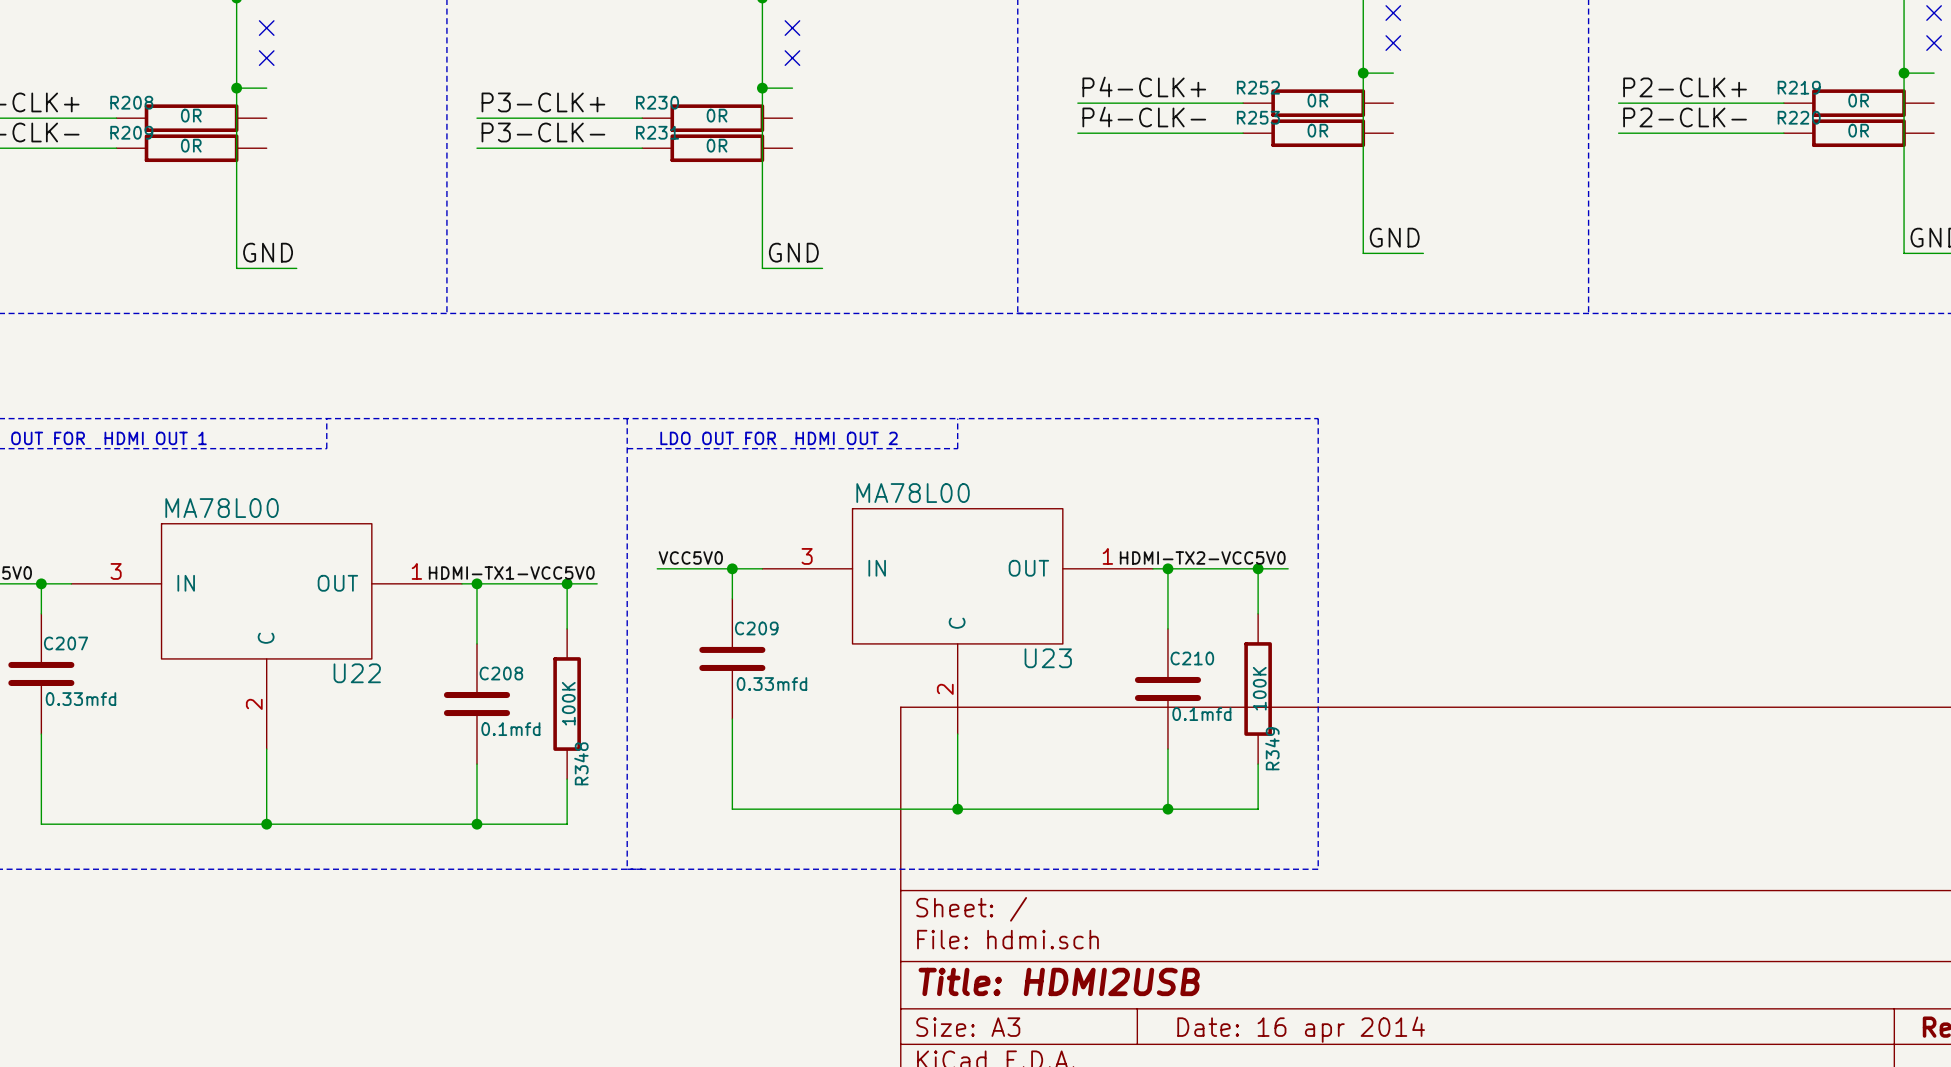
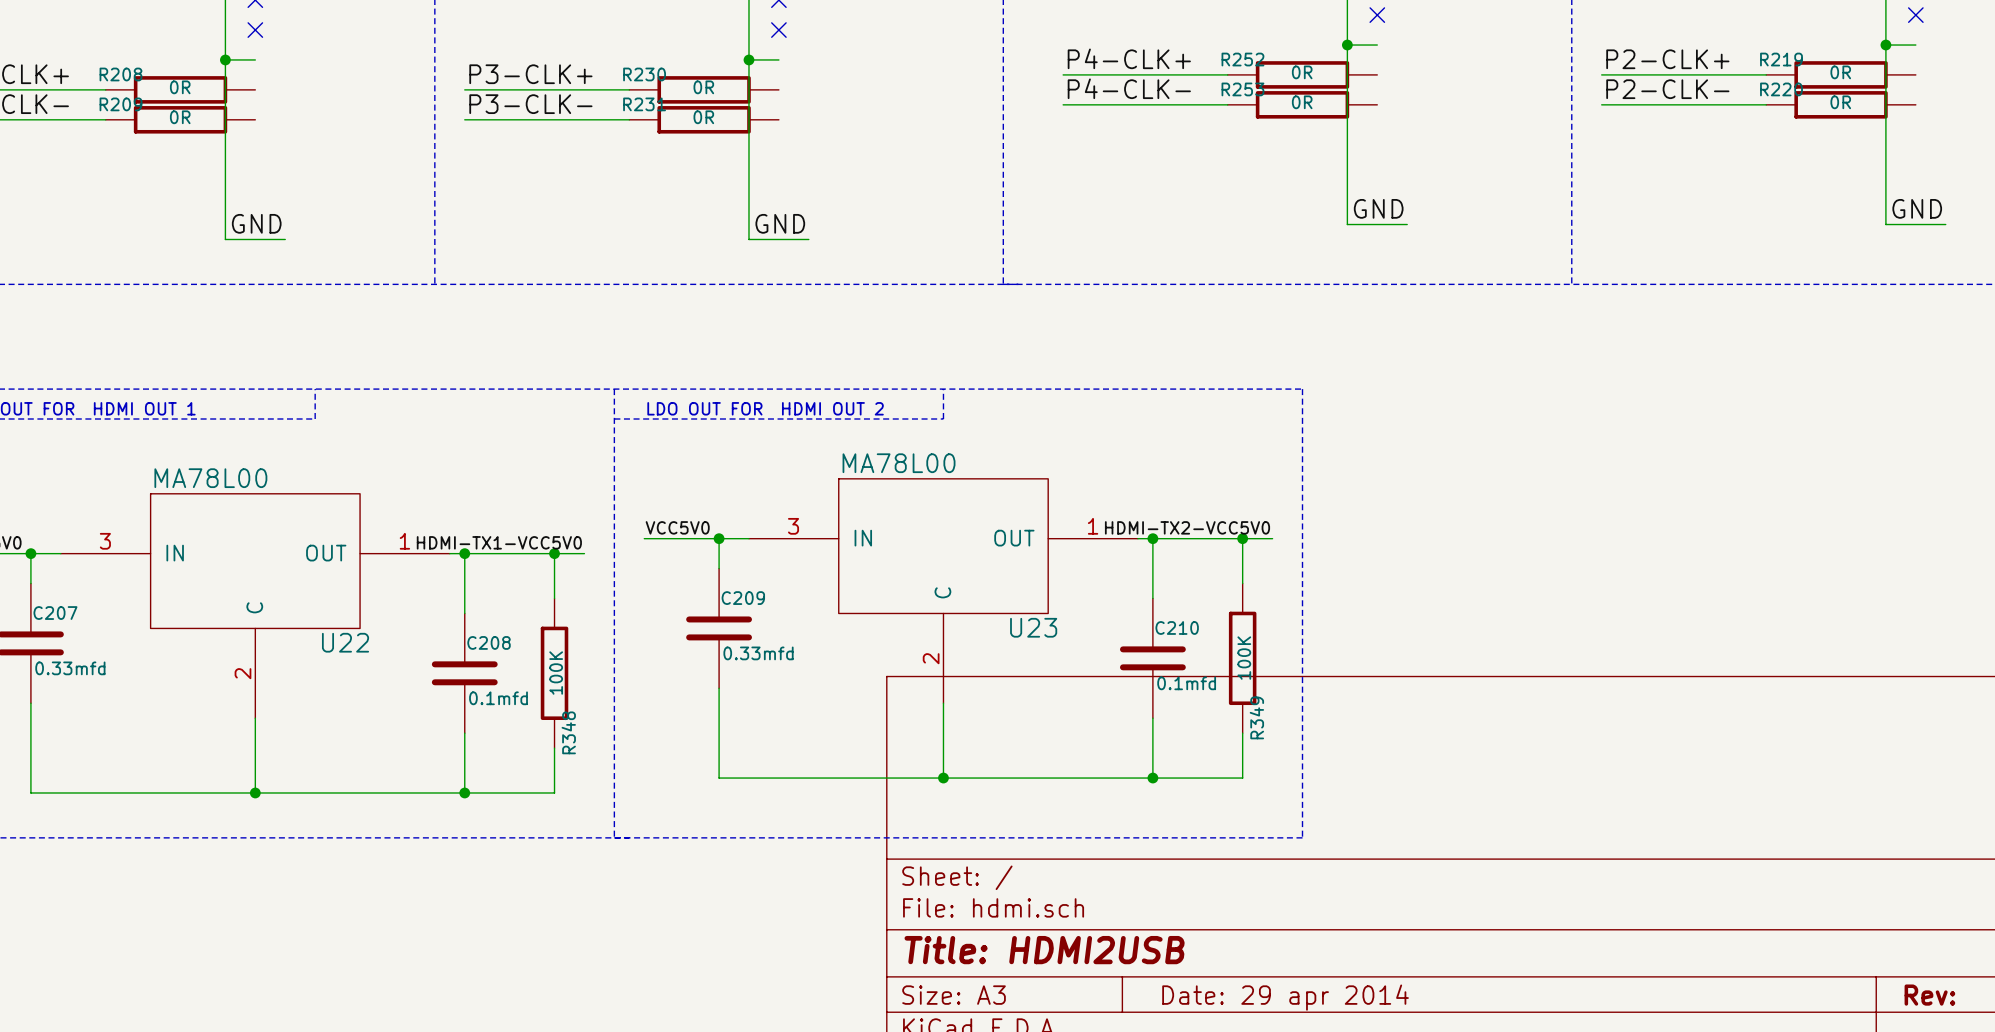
title block: Date: 16 apr 2014 (1301, 1029) -> Date: 29 apr 2014 (1285, 997)

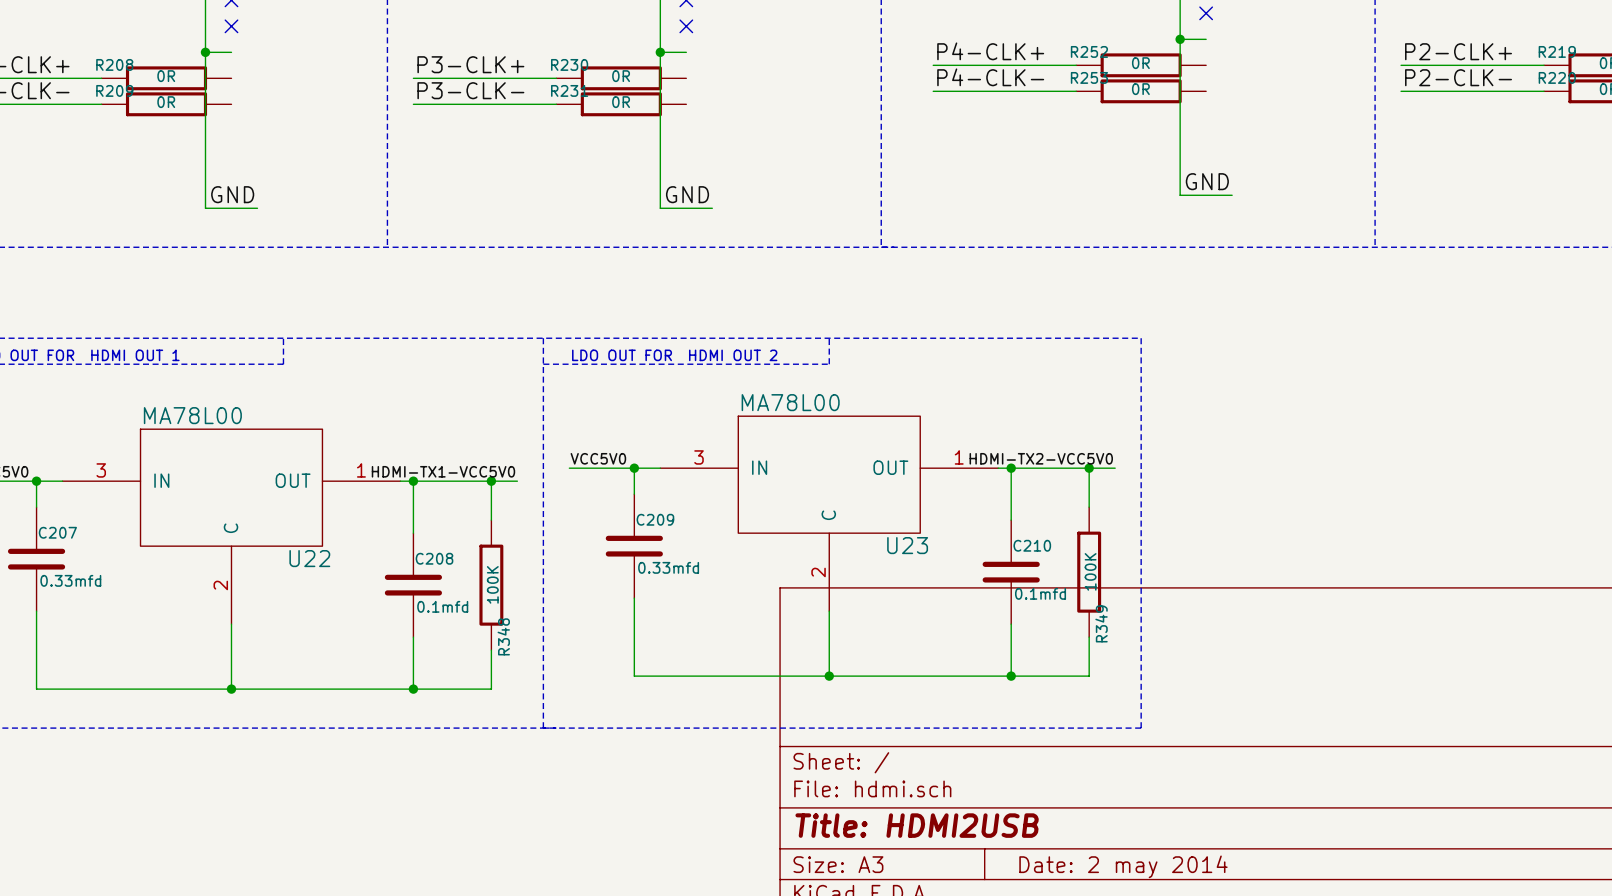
title block: Date: 29 apr 2014 (1285, 997) -> Date: 2 may 2014 (1123, 866)

